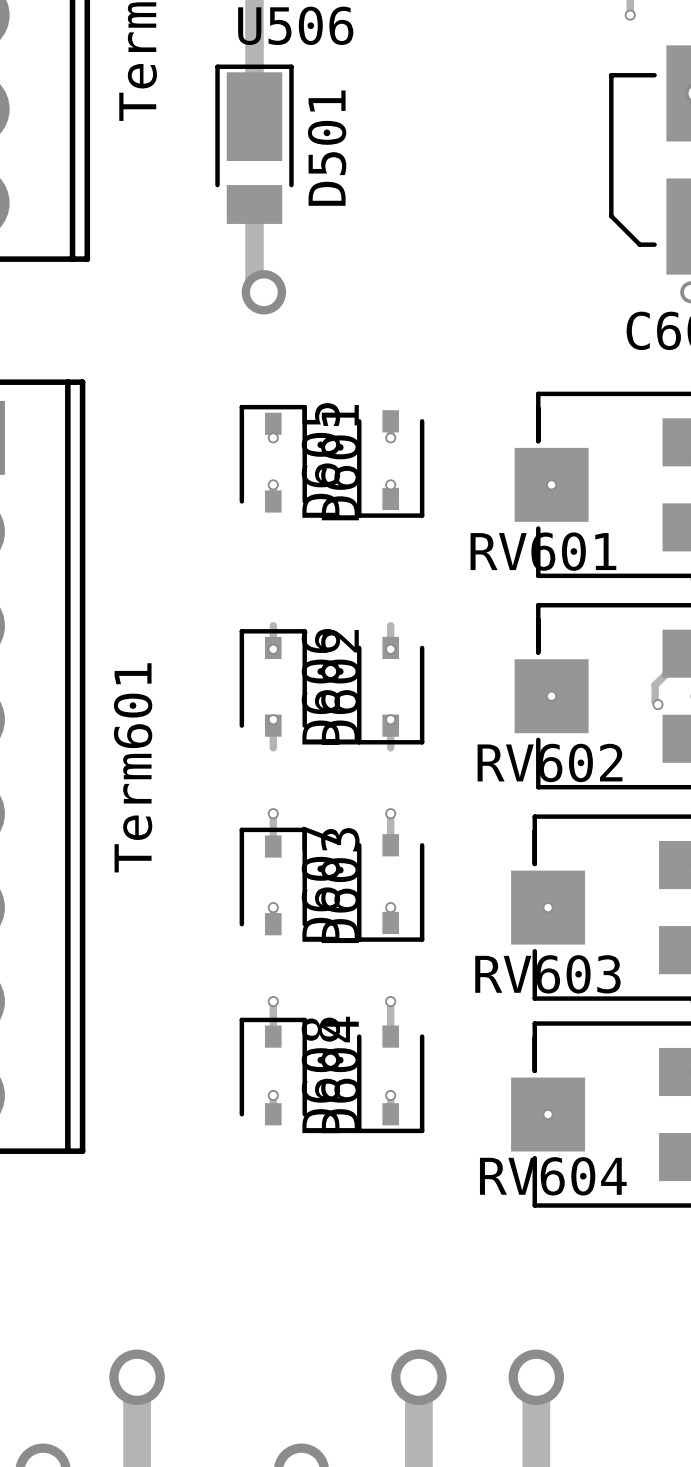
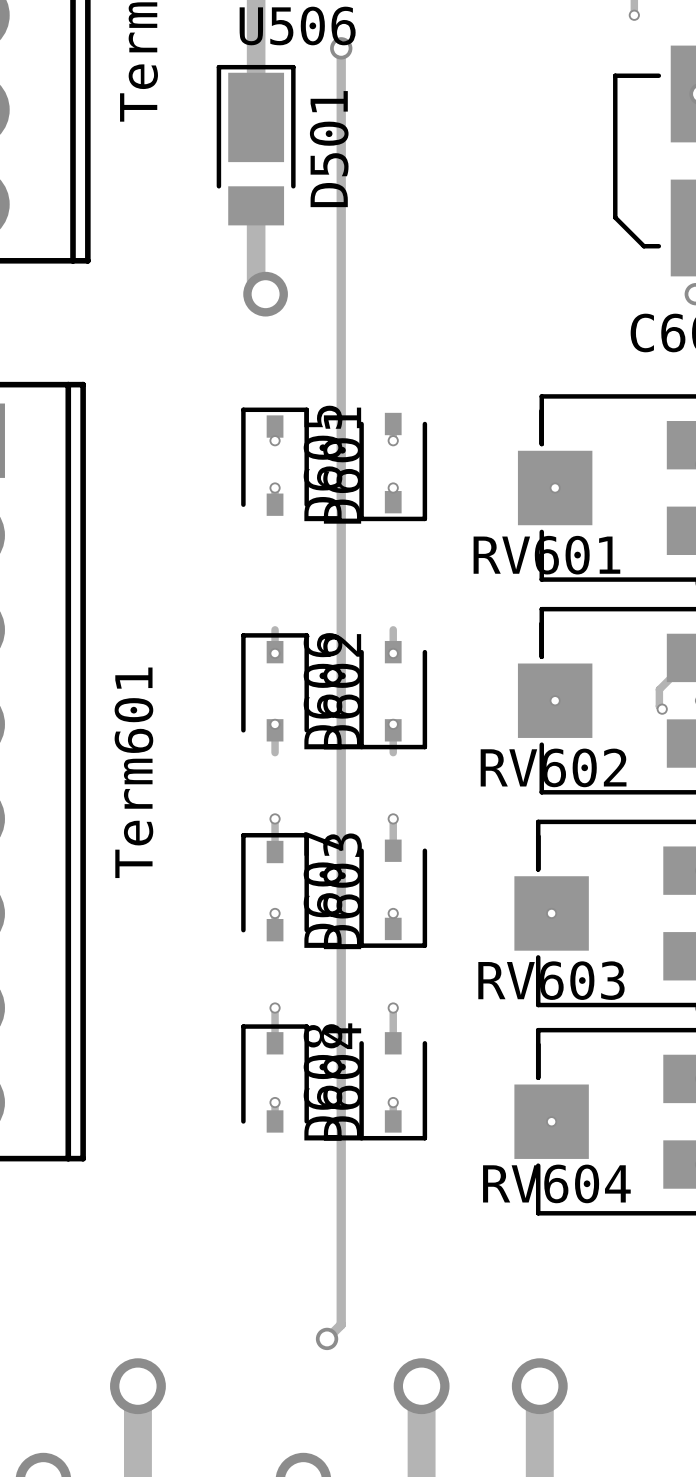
track: none -> (341, 48) (341, 1324) (327, 1338)
via: none -> (341, 48)
via: none -> (327, 1338)

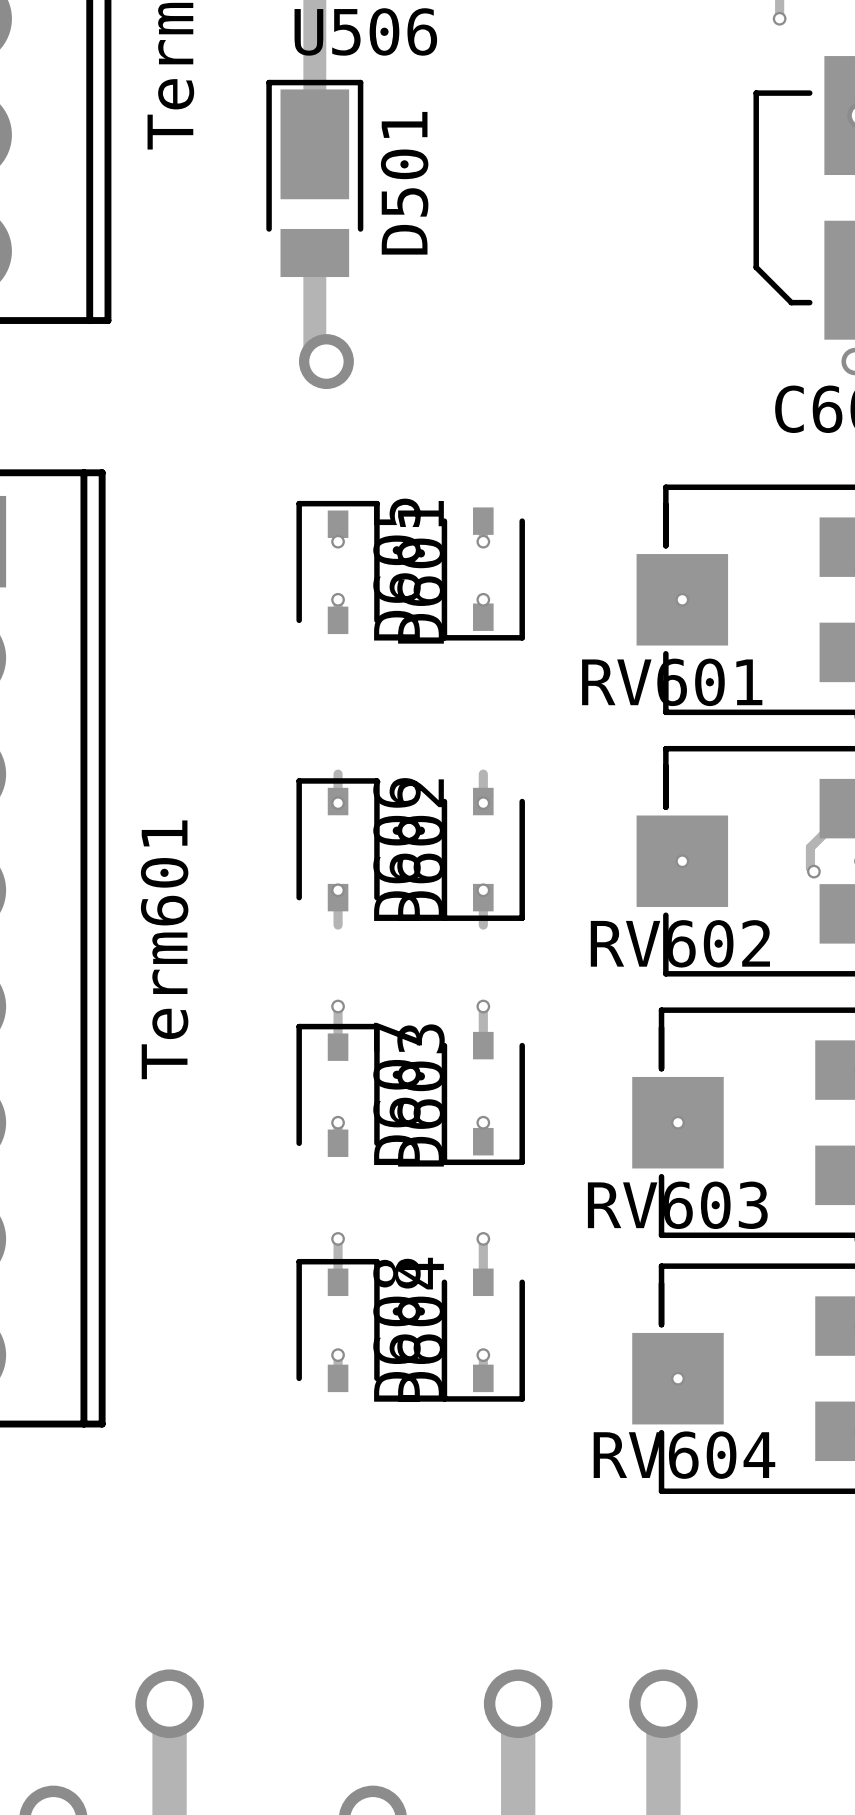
track: (341, 48) (341, 1324) (327, 1338) -> none
via: (341, 48) -> none
via: (327, 1338) -> none

